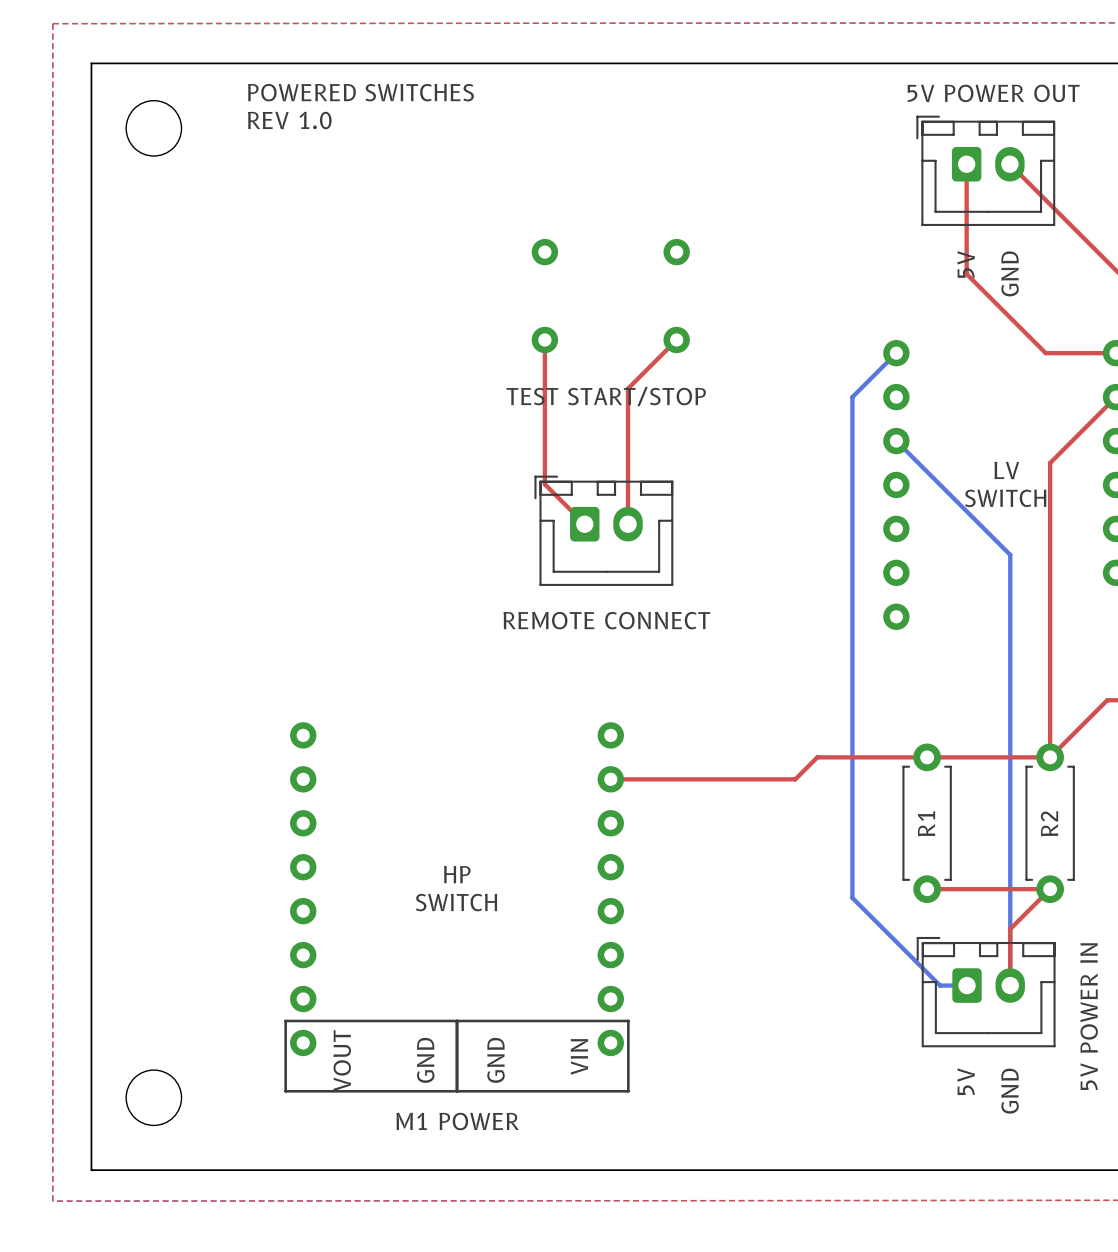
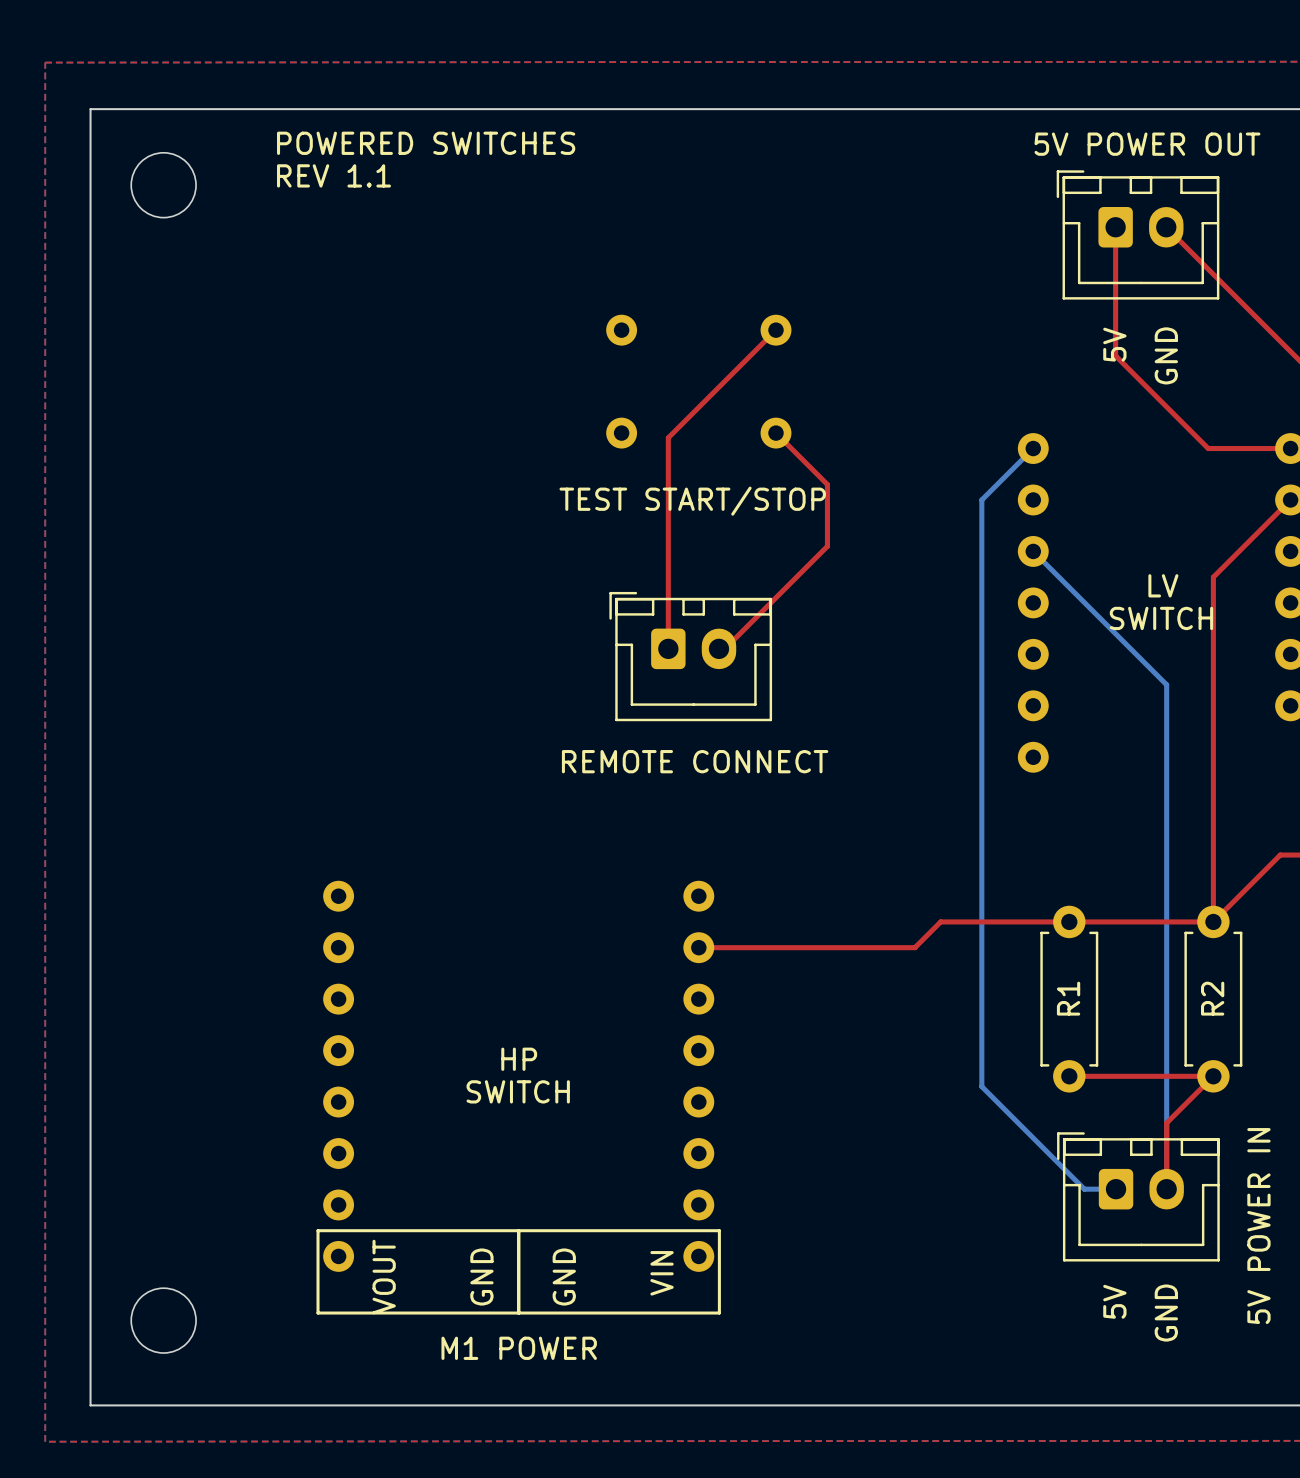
text: REV 1.0 (289, 120) -> REV 1.1 (333, 175)
top track: (544, 339) (544, 484) (584, 524) -> (775, 330) (668, 437) (668, 648)
top track: (676, 339) (628, 388) (628, 524) -> (775, 433) (827, 484) (827, 546) (724, 648) (718, 648)

